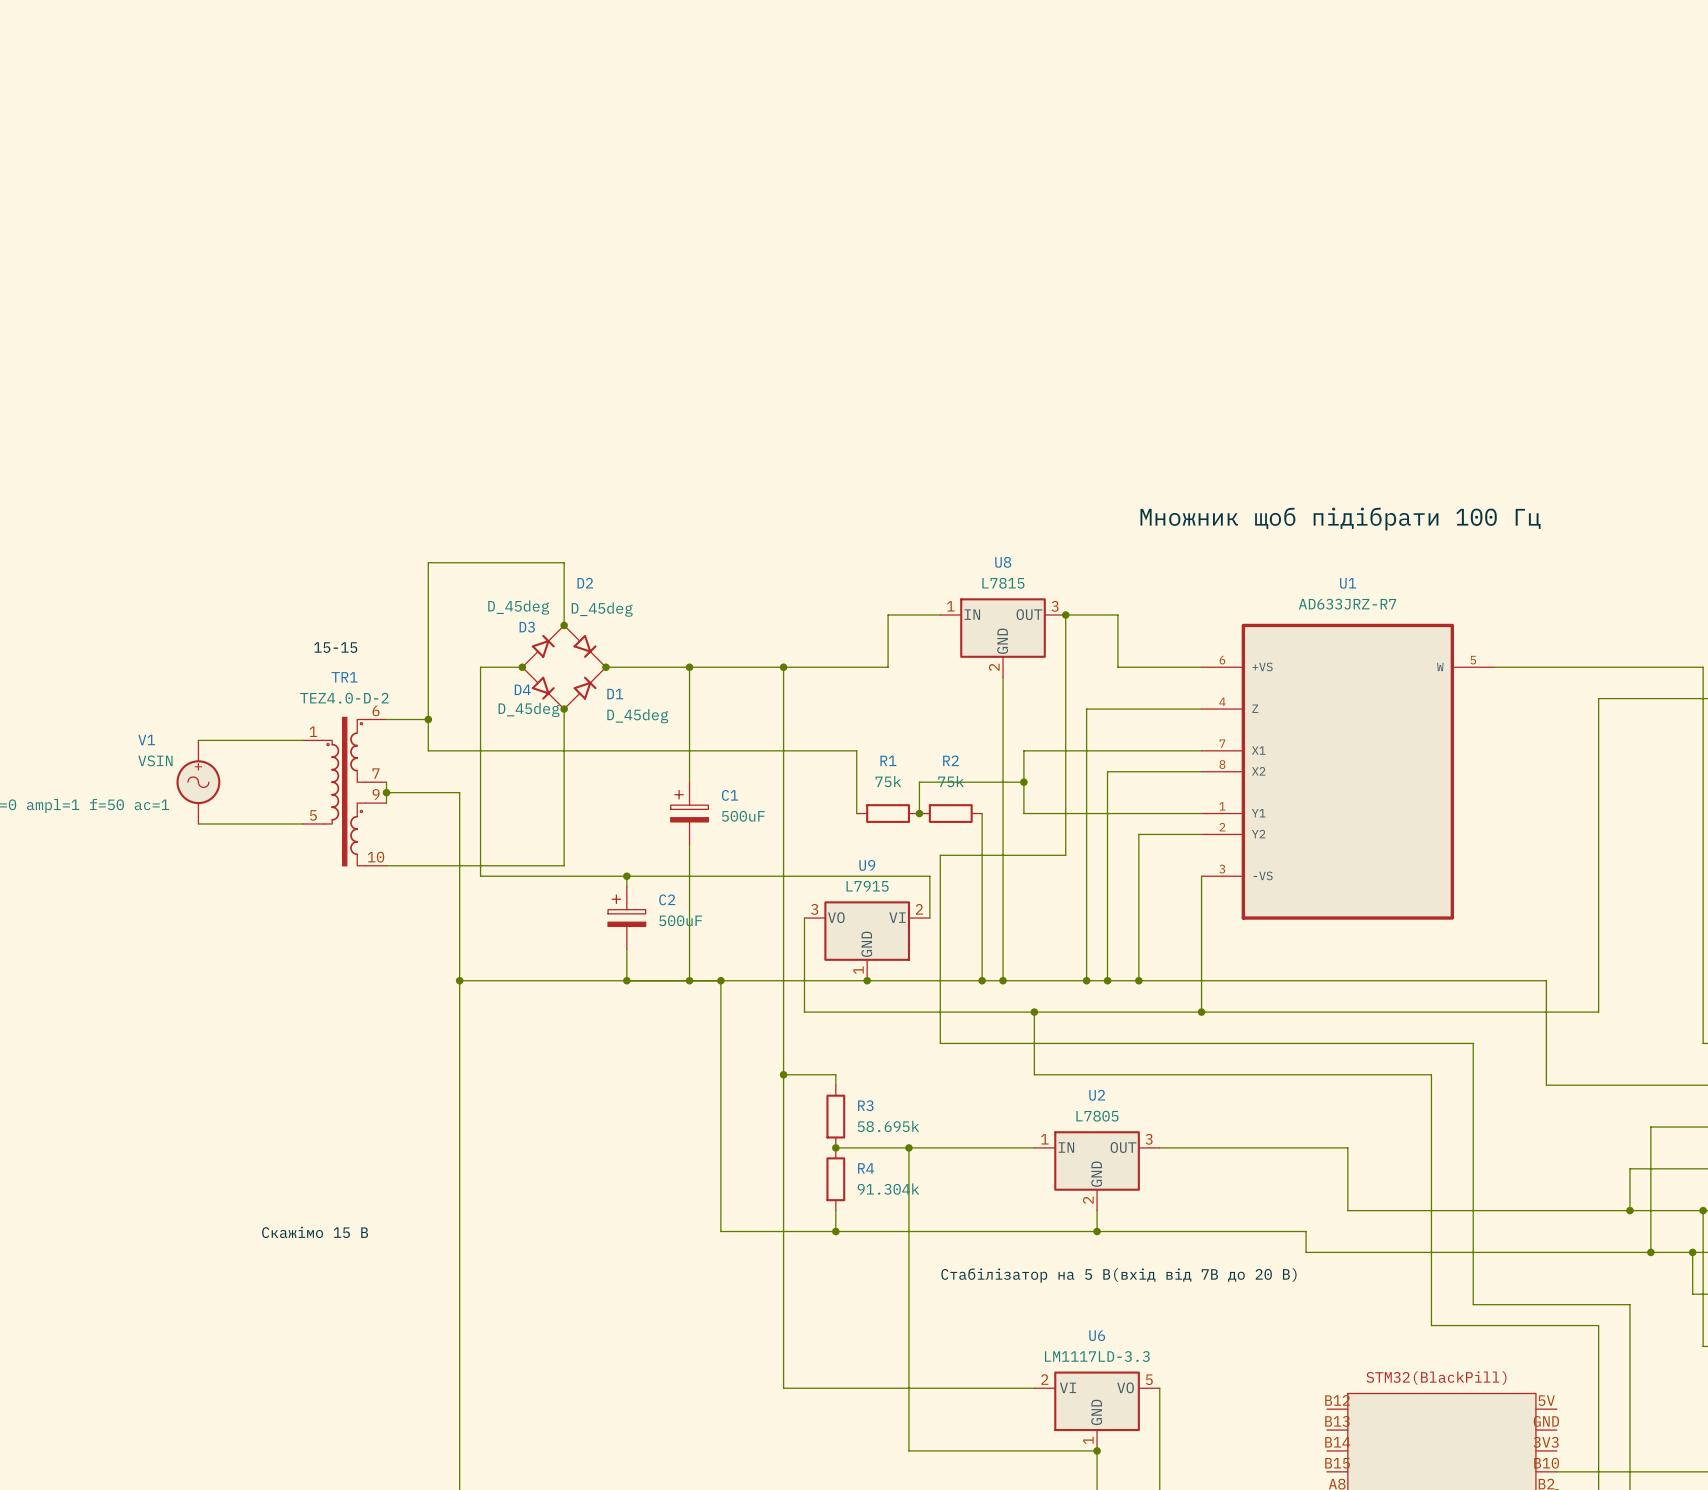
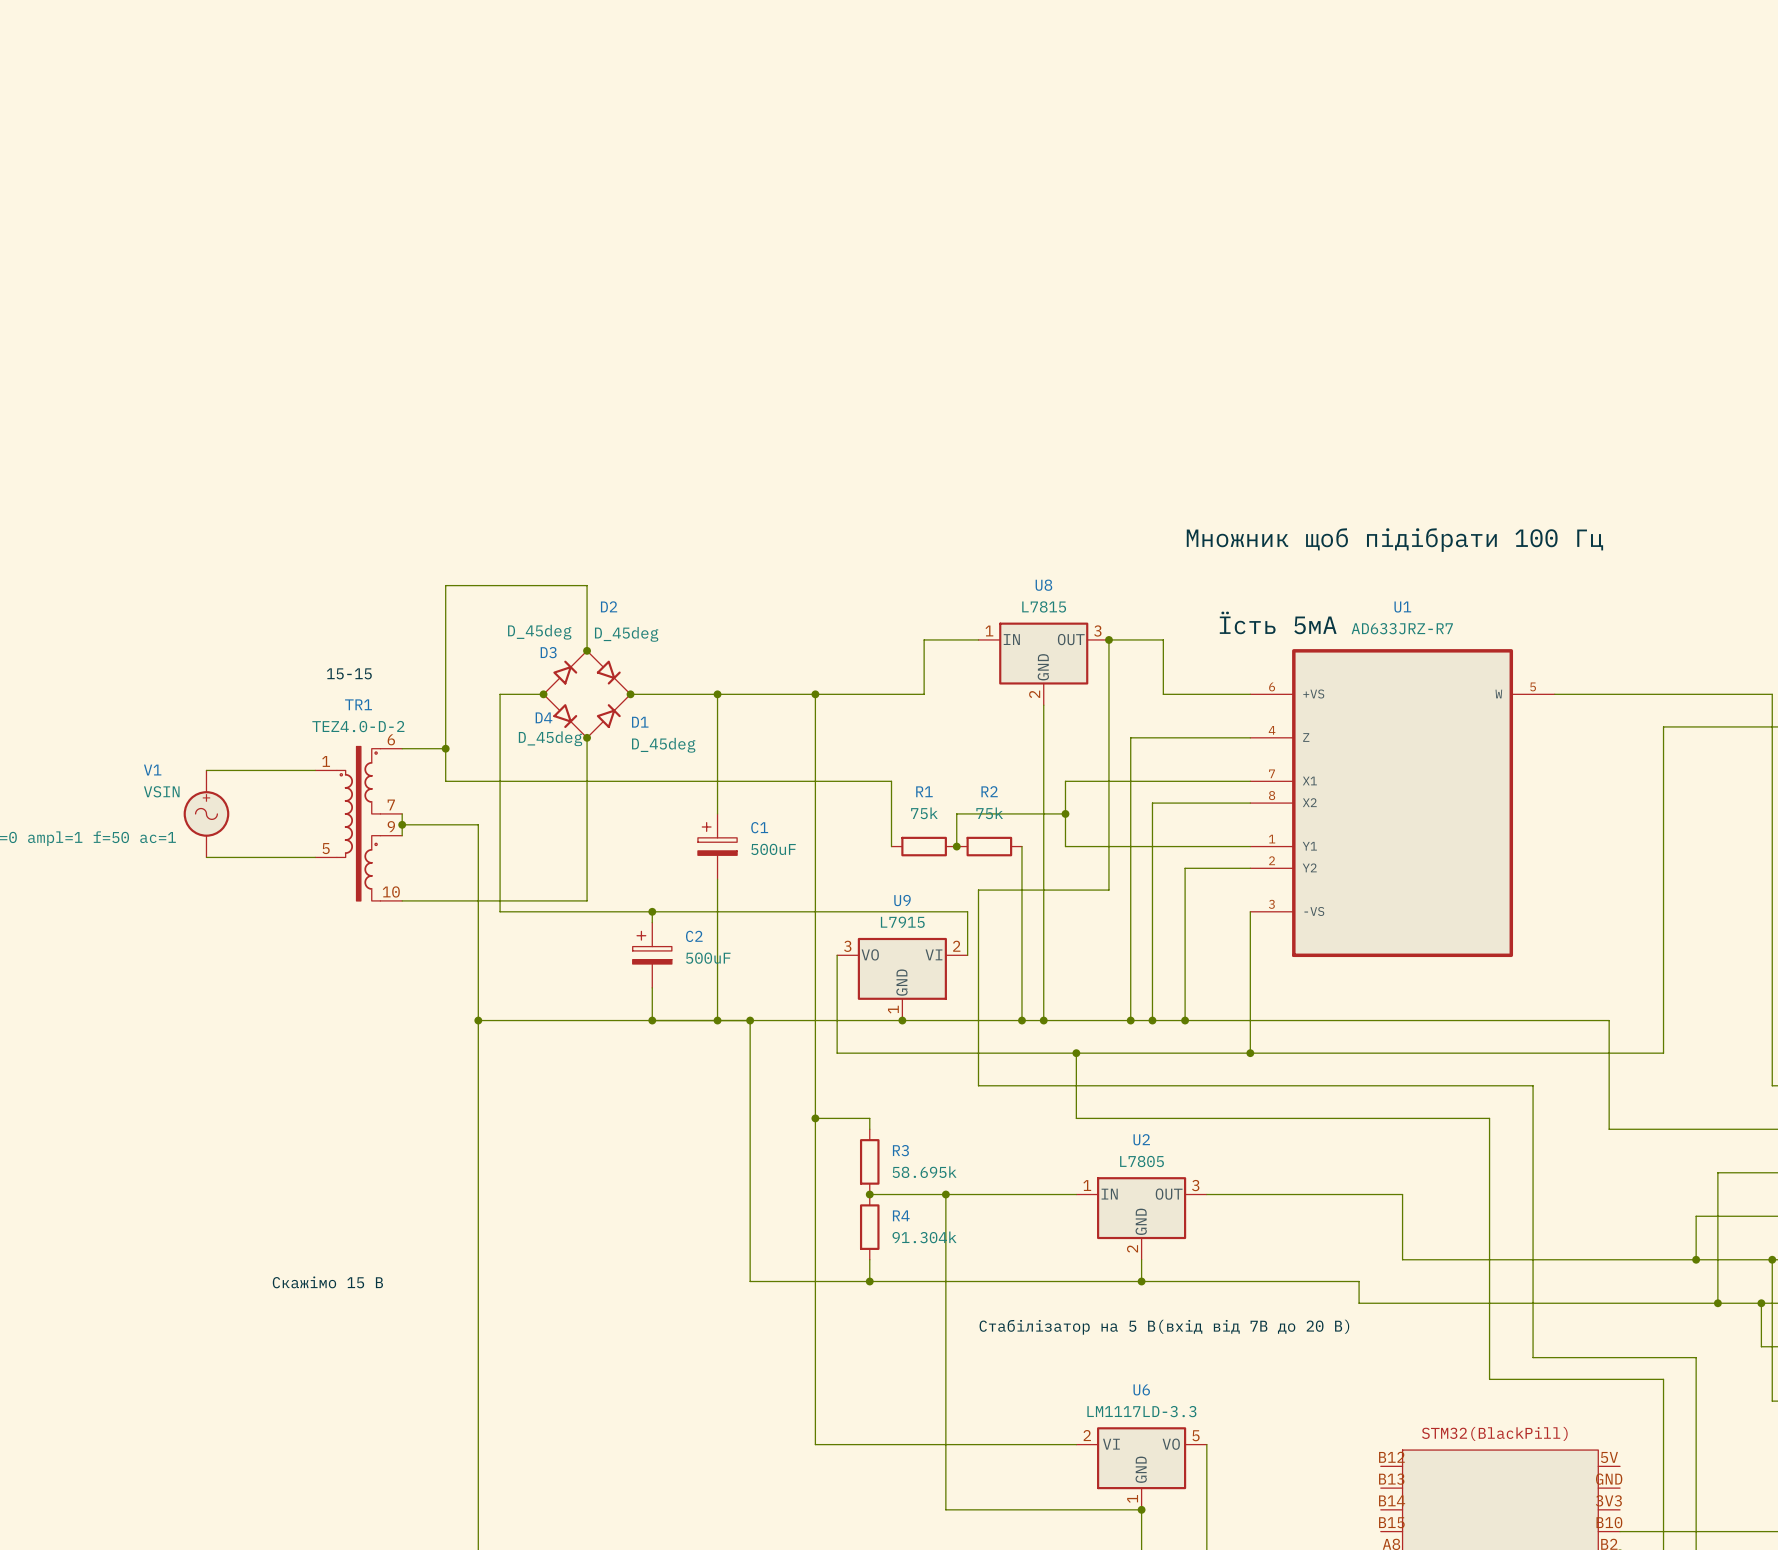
label: none -> Їсть 5мА (1278, 622)

